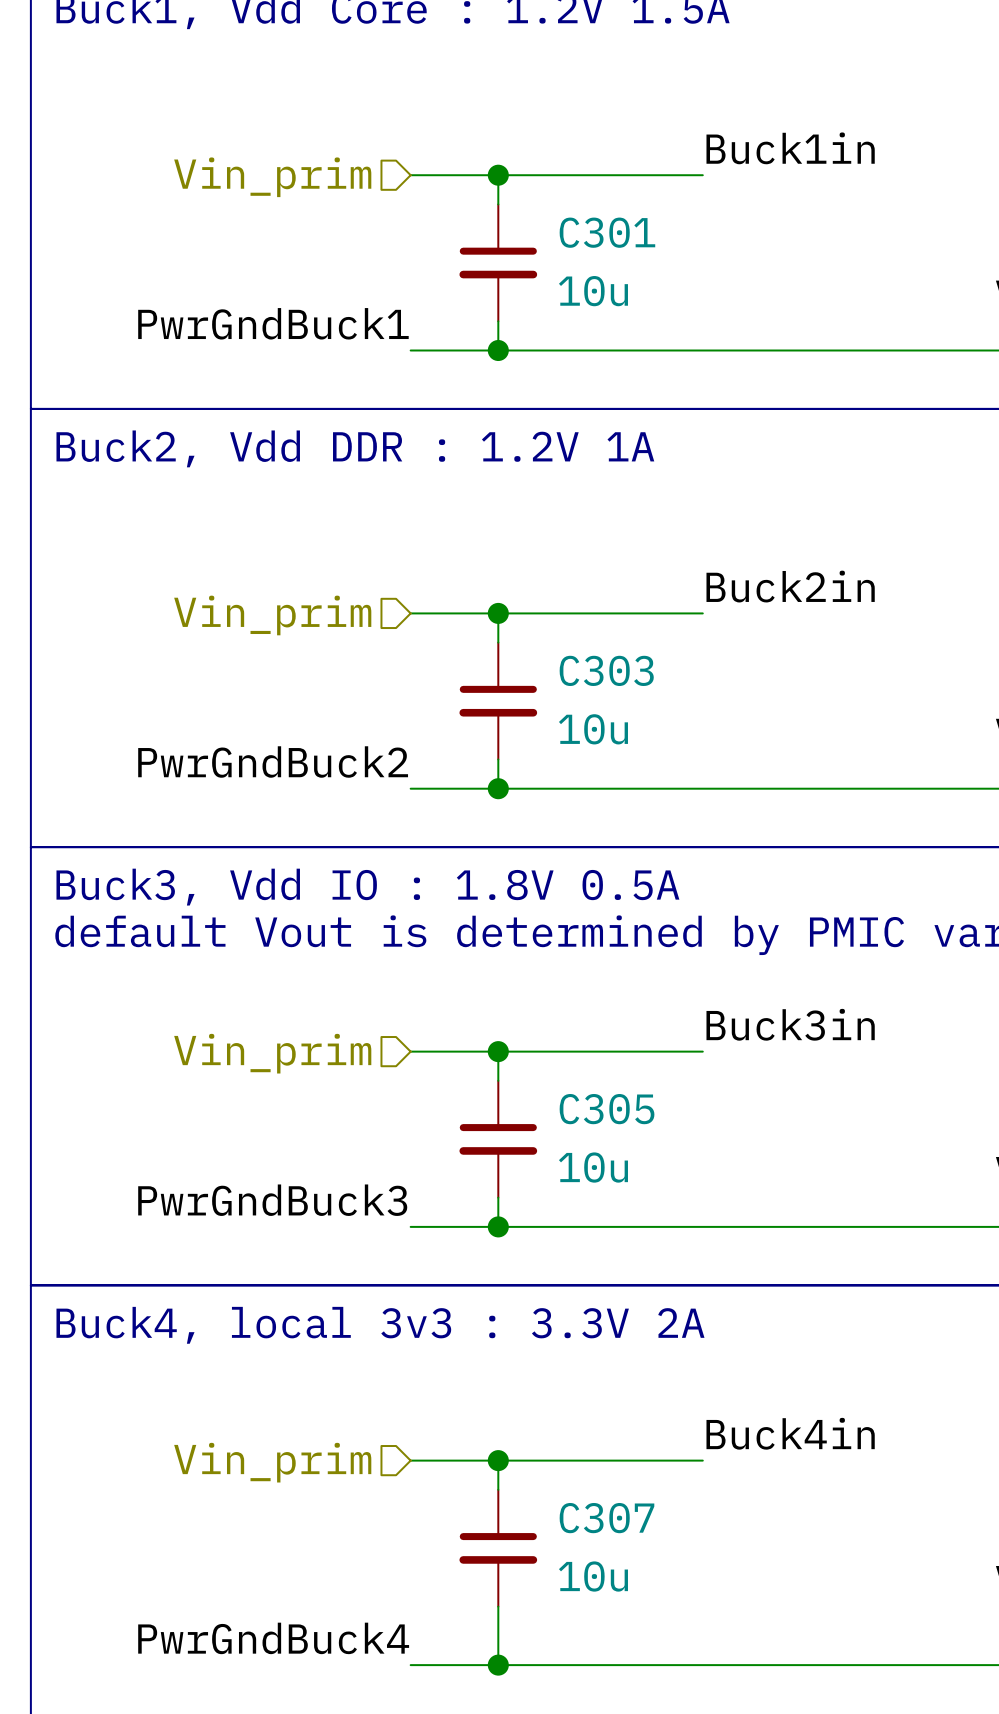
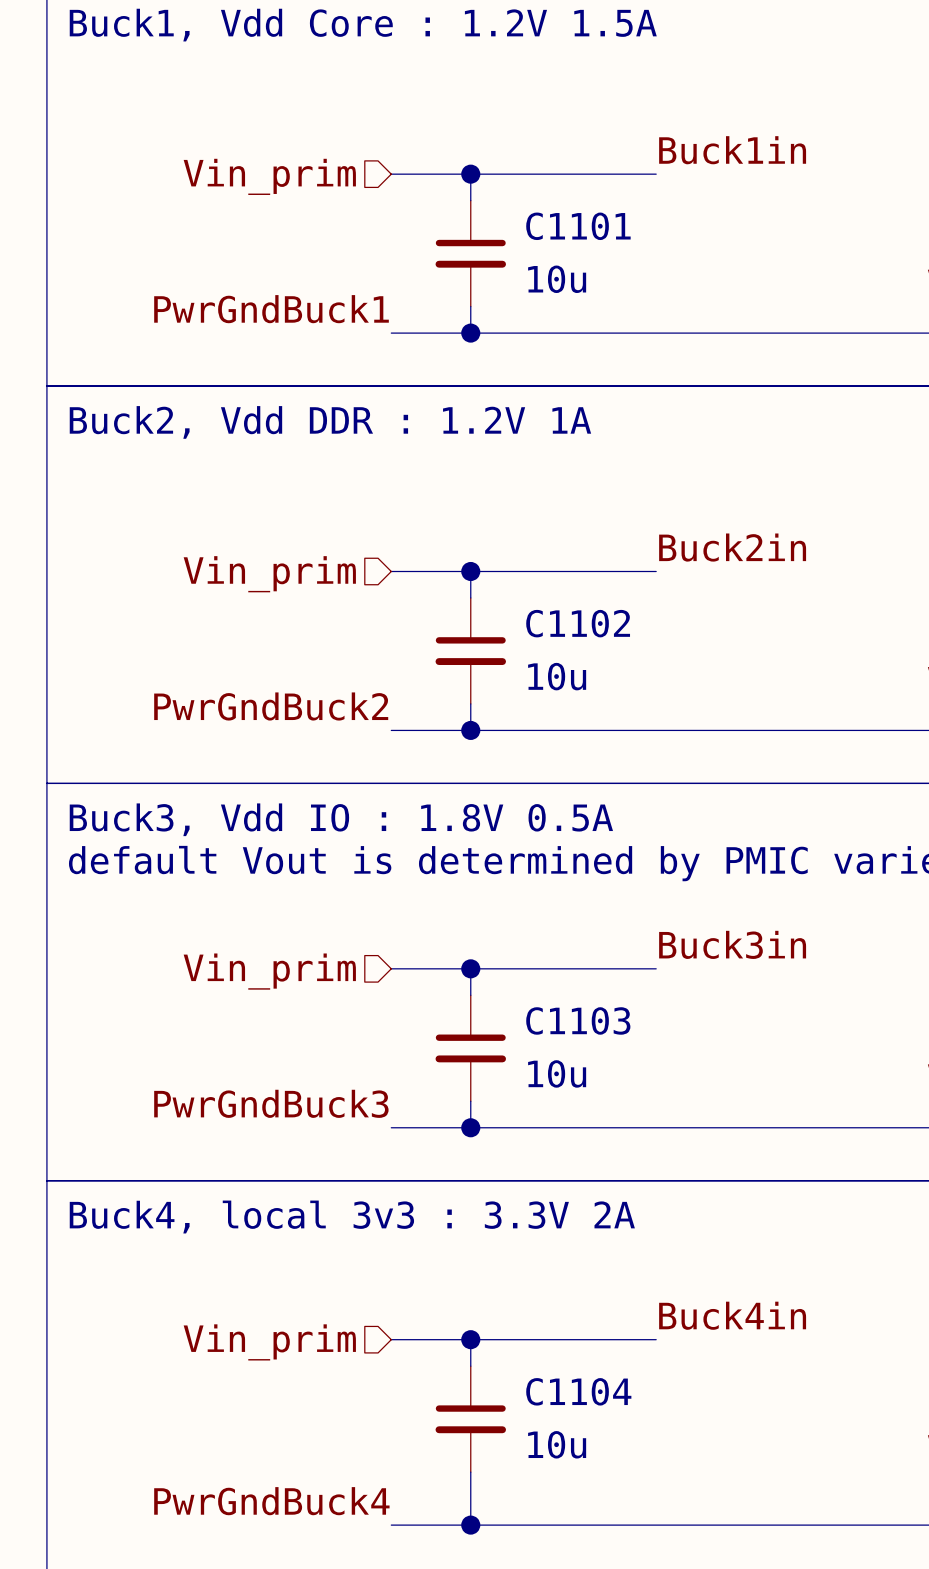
C301 name: C301 (607, 232) -> C1101 (578, 226)
C303 name: C303 (606, 670) -> C1102 (578, 623)
C305 name: C305 (607, 1109) -> C1103 (578, 1020)
C307 name: C307 (606, 1518) -> C1104 (578, 1391)

